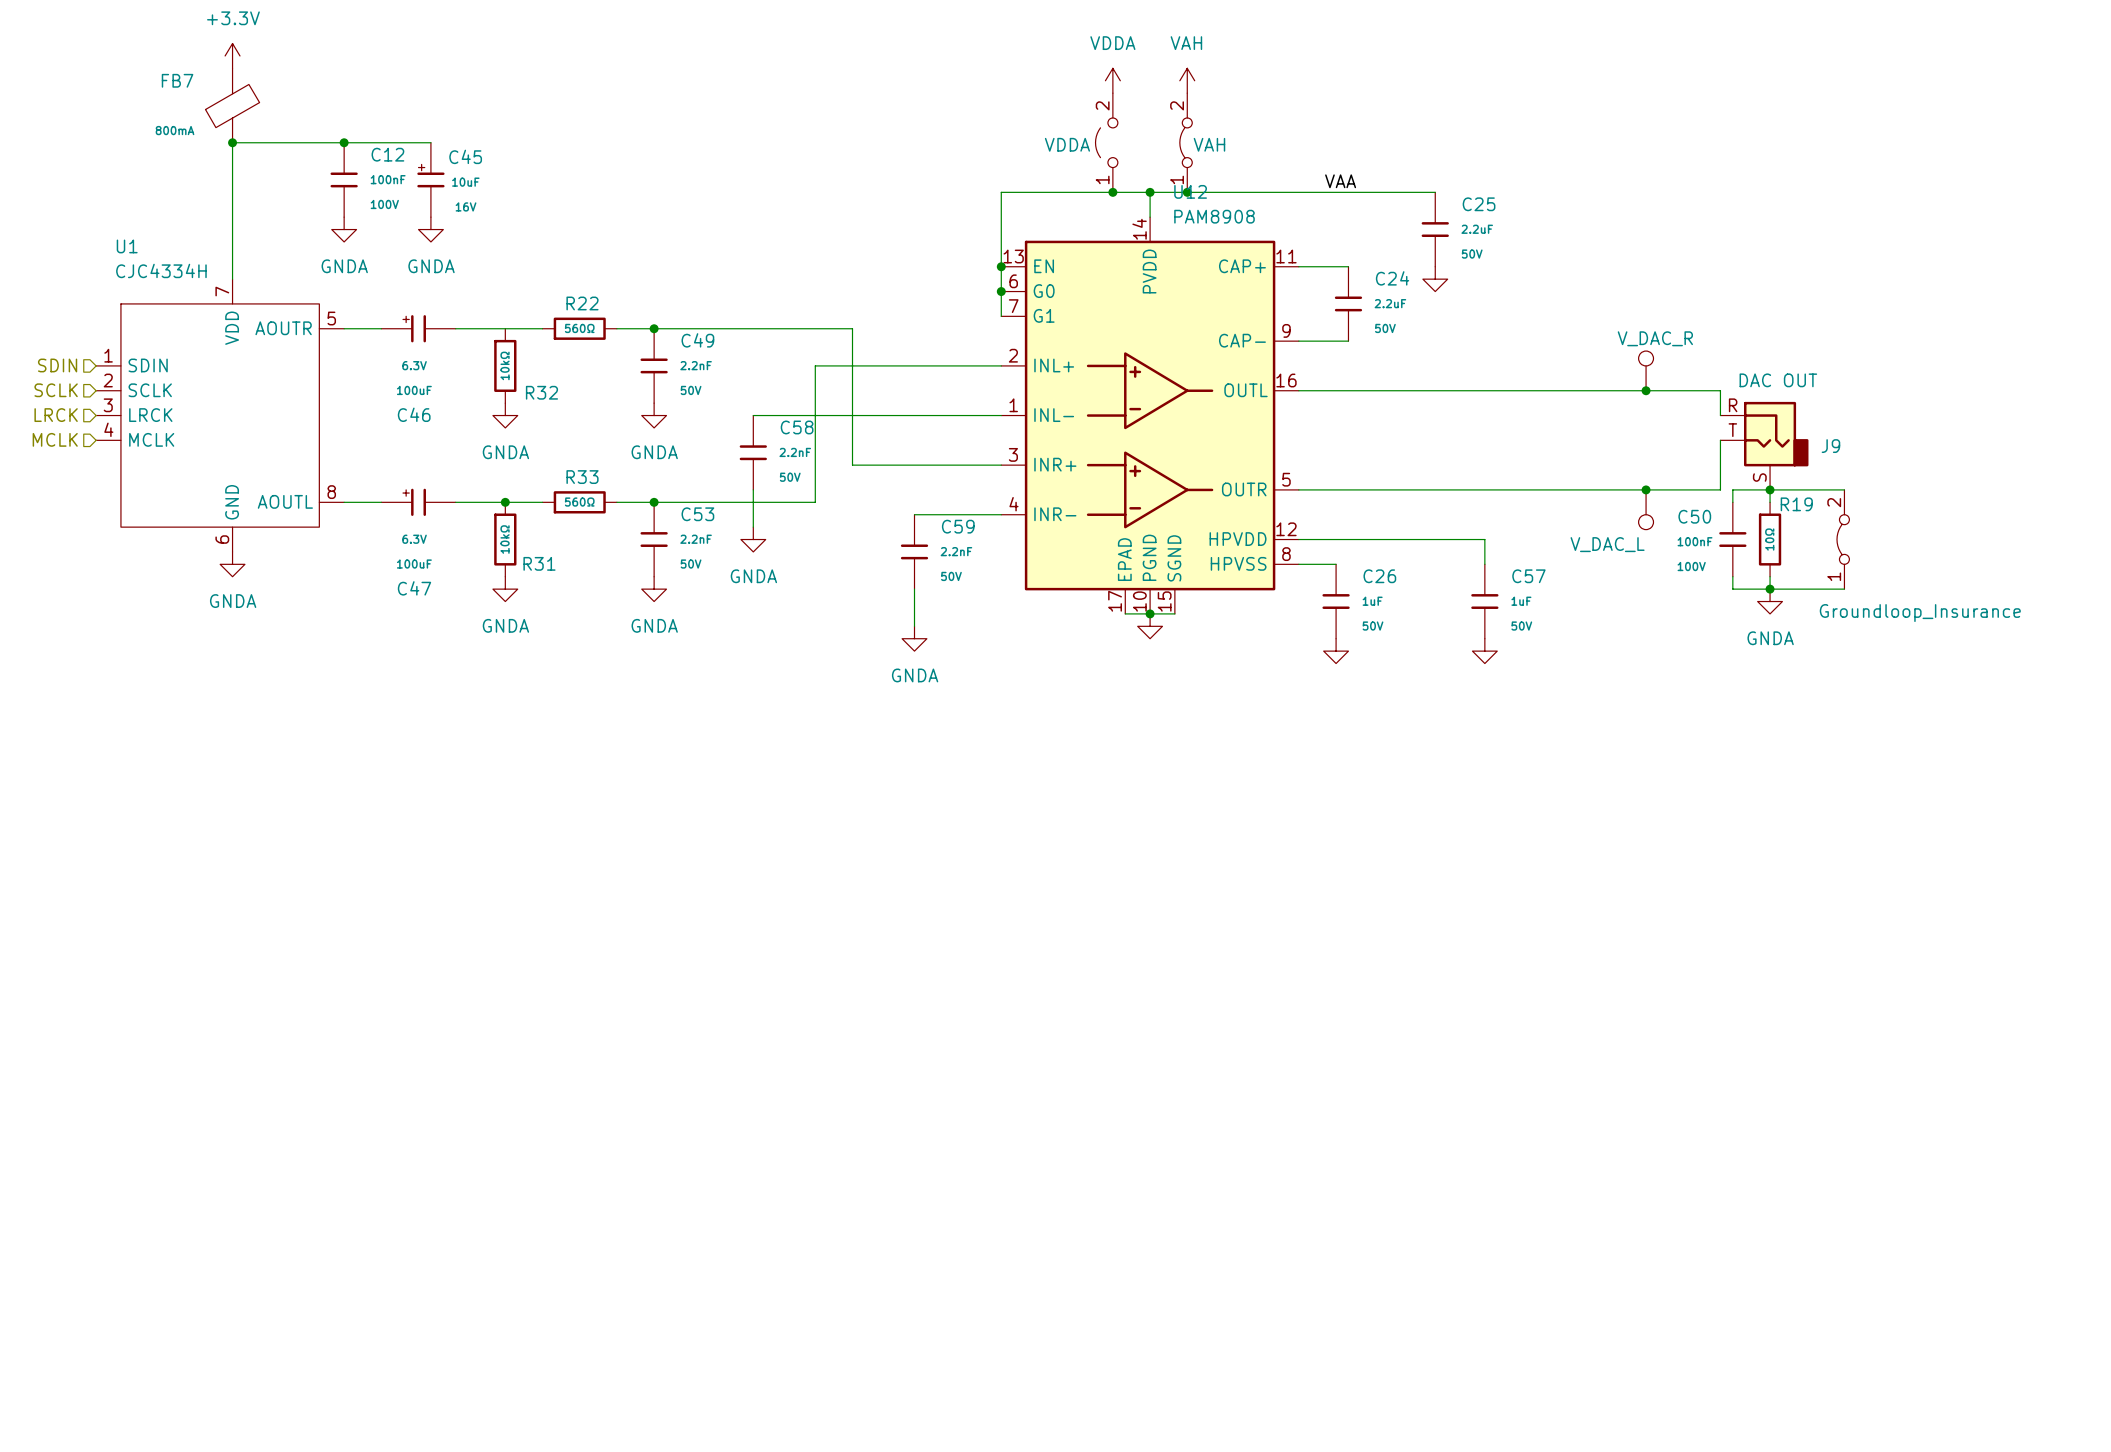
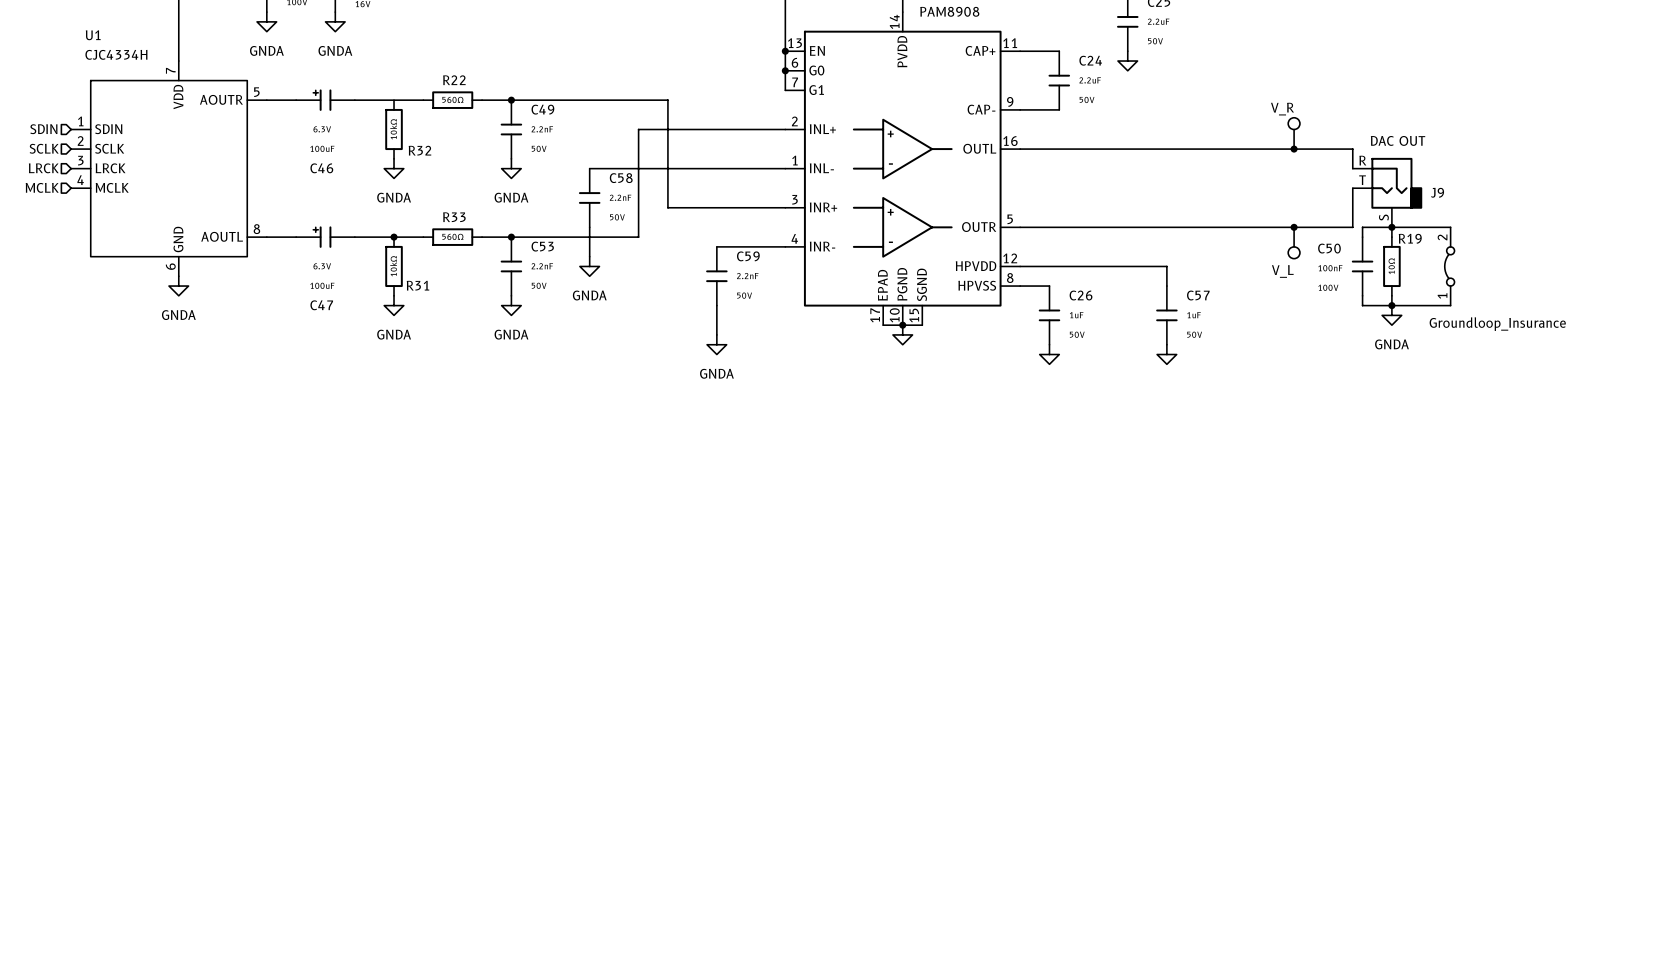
part value: V_DAC_R (1655, 338) -> V_R (1282, 109)
part value: V_DAC_L (1607, 544) -> V_L (1282, 271)

